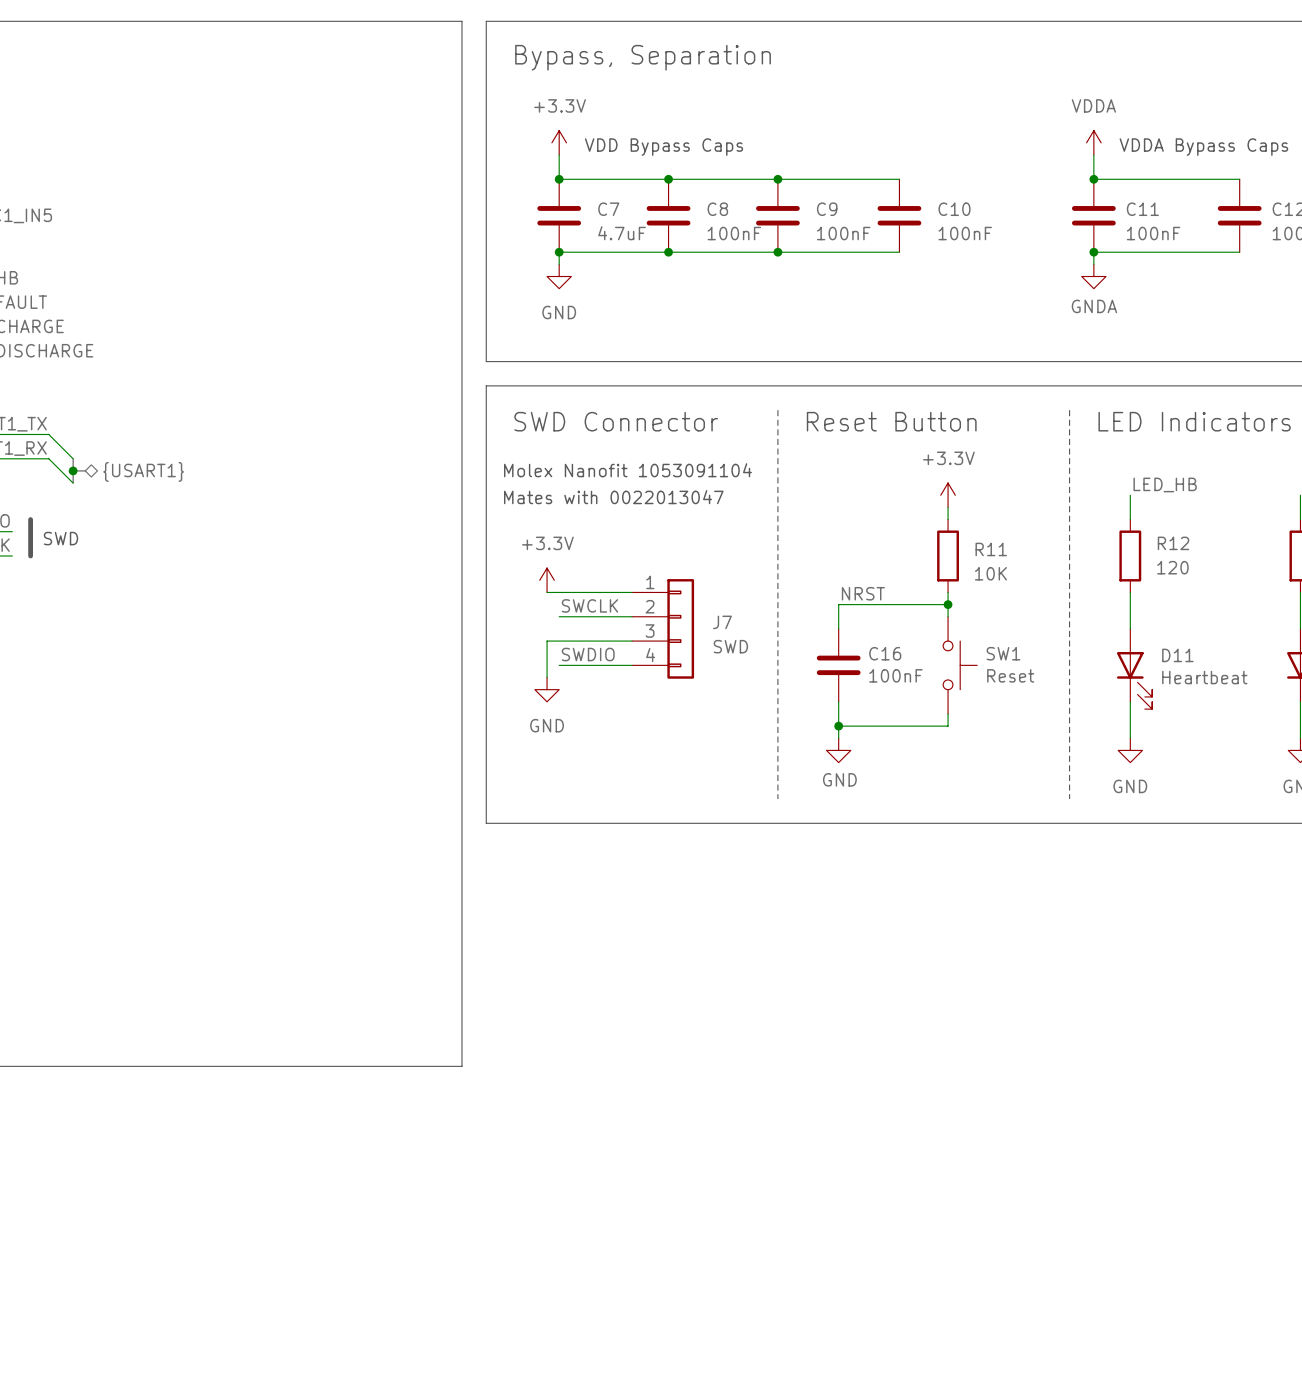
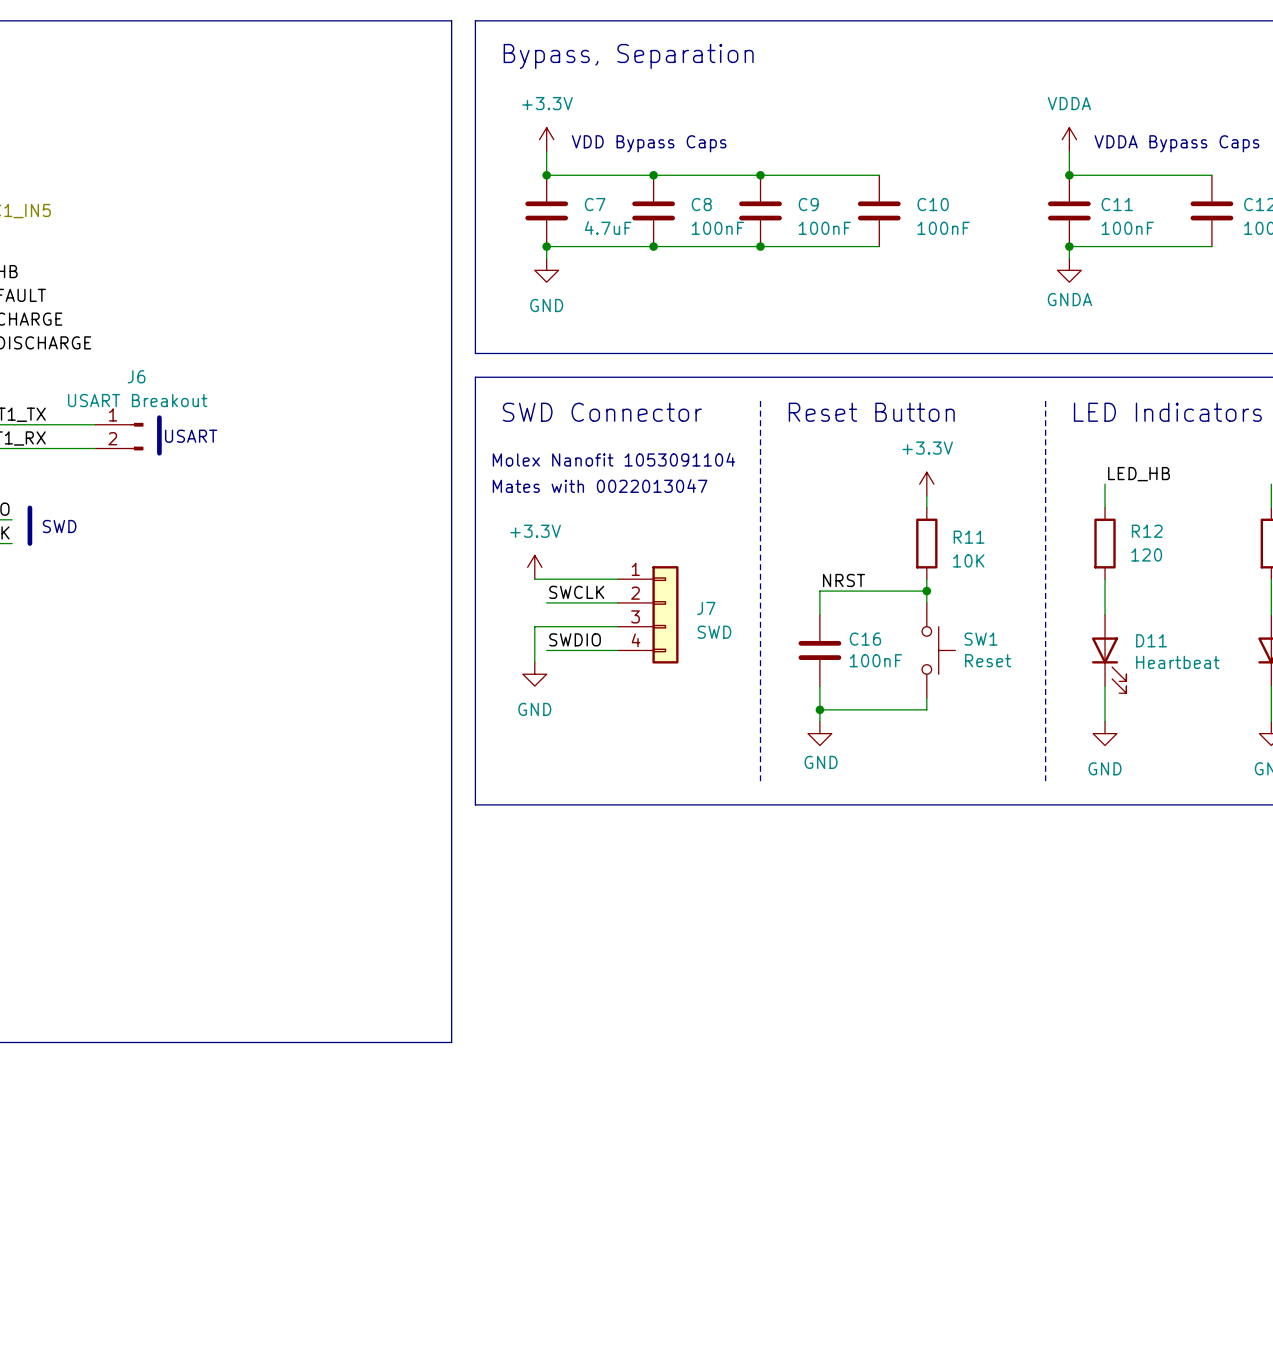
line: none -> (159, 417) (159, 453)
wire: (48, 434) (73, 458) -> (47, 424) (95, 424)
J6: none -> USART Breakout (119, 436)
text: none -> USART (191, 436)
wire: (48, 458) (73, 483) -> (47, 448) (95, 448)
bus: (73, 458) (73, 483) -> none
bus: (73, 470) (85, 470) -> none
junction: (73, 470) -> none
hierarchical label: {USART1} (143, 471) -> none

